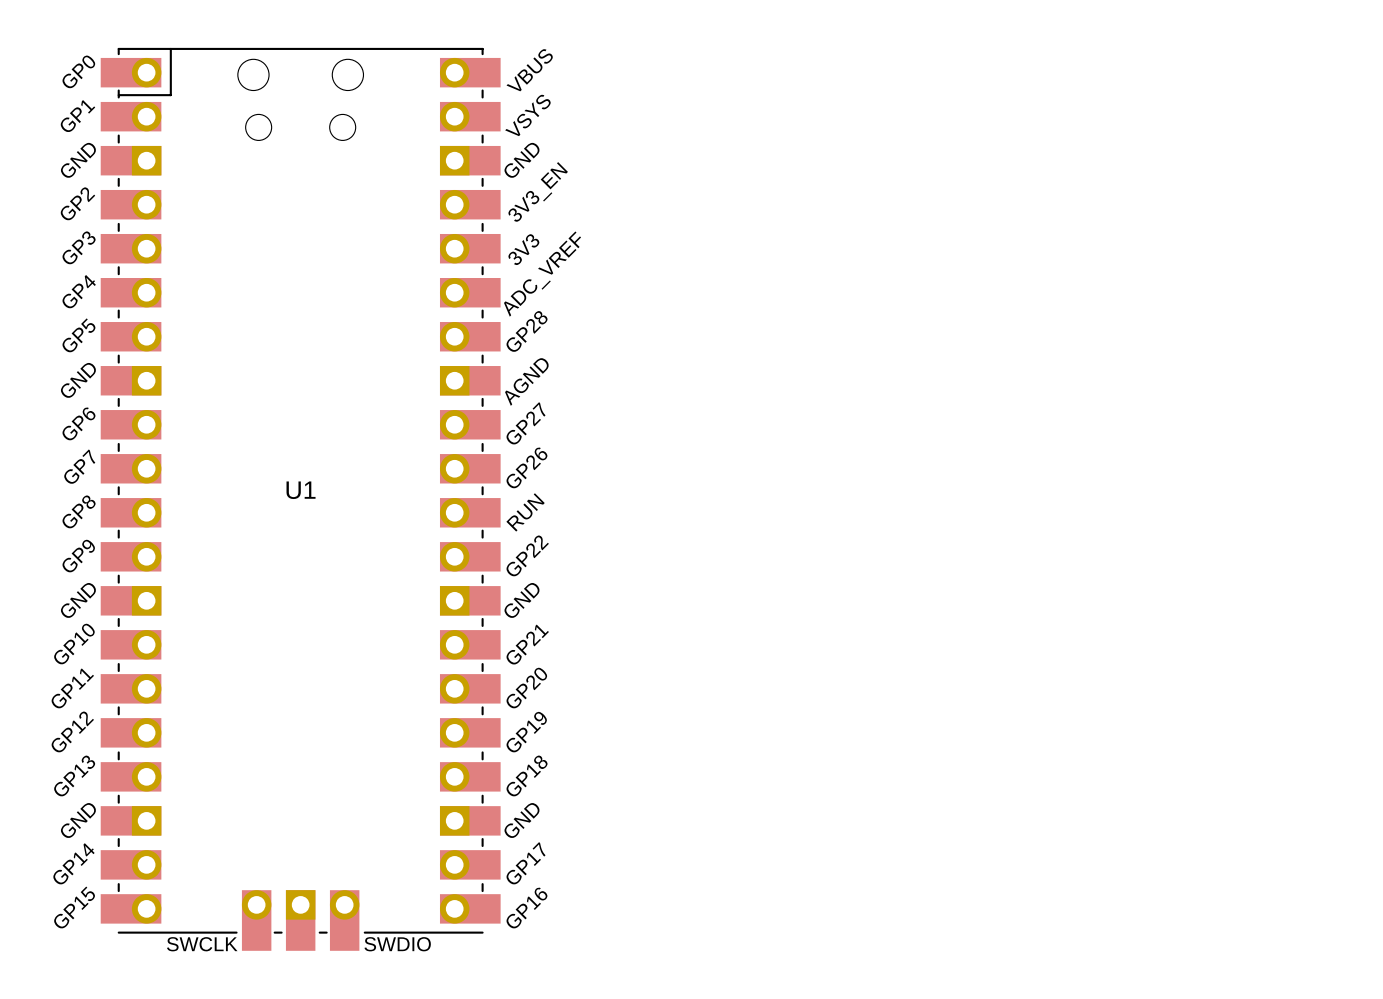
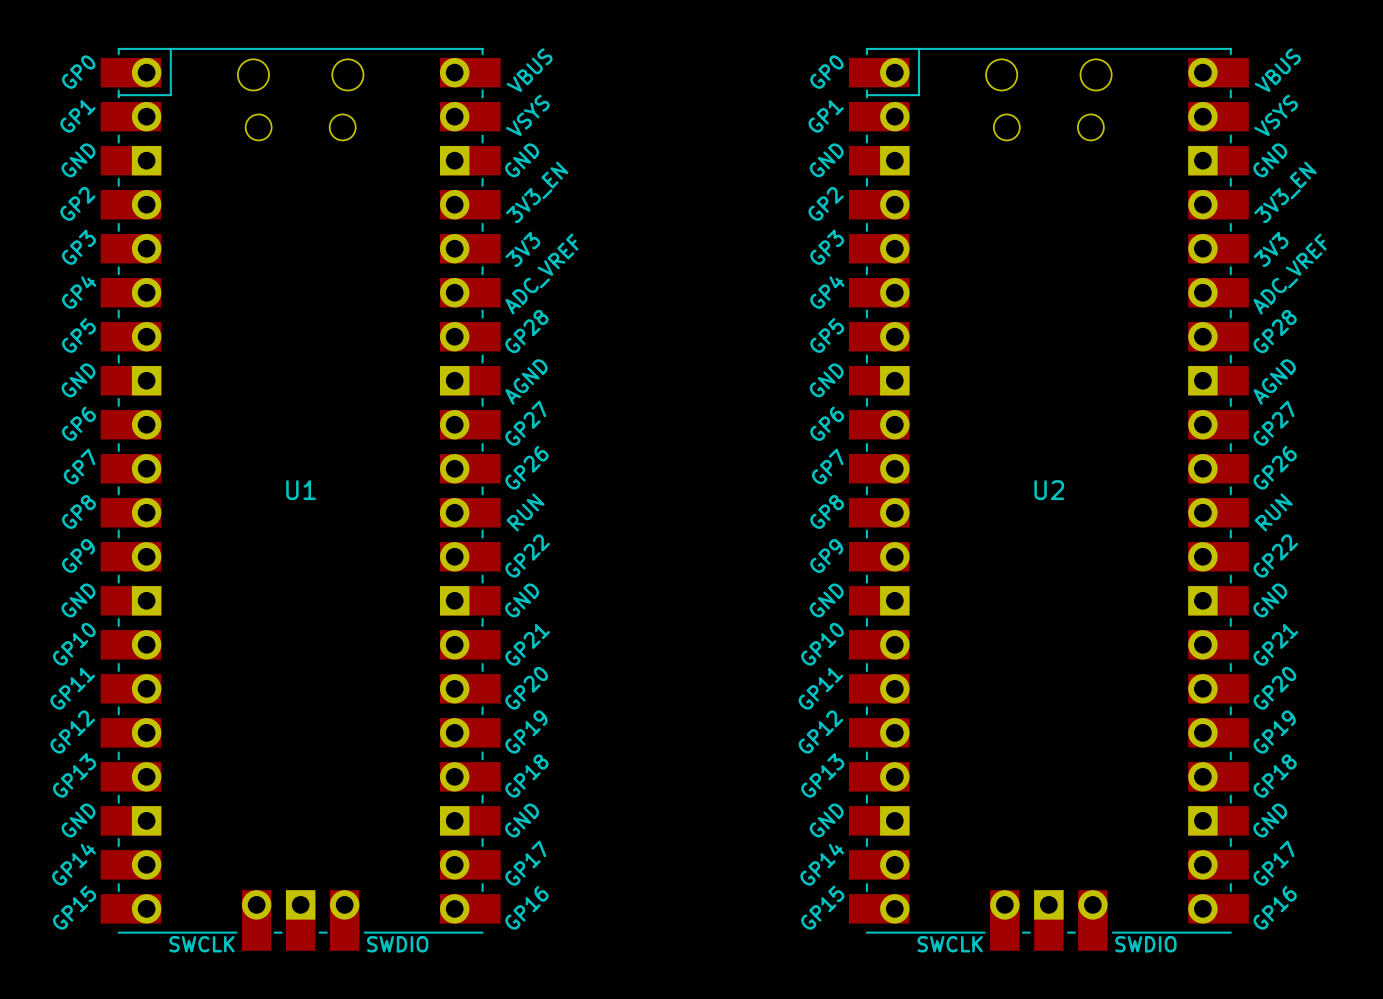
U2: none -> (1048, 499)

